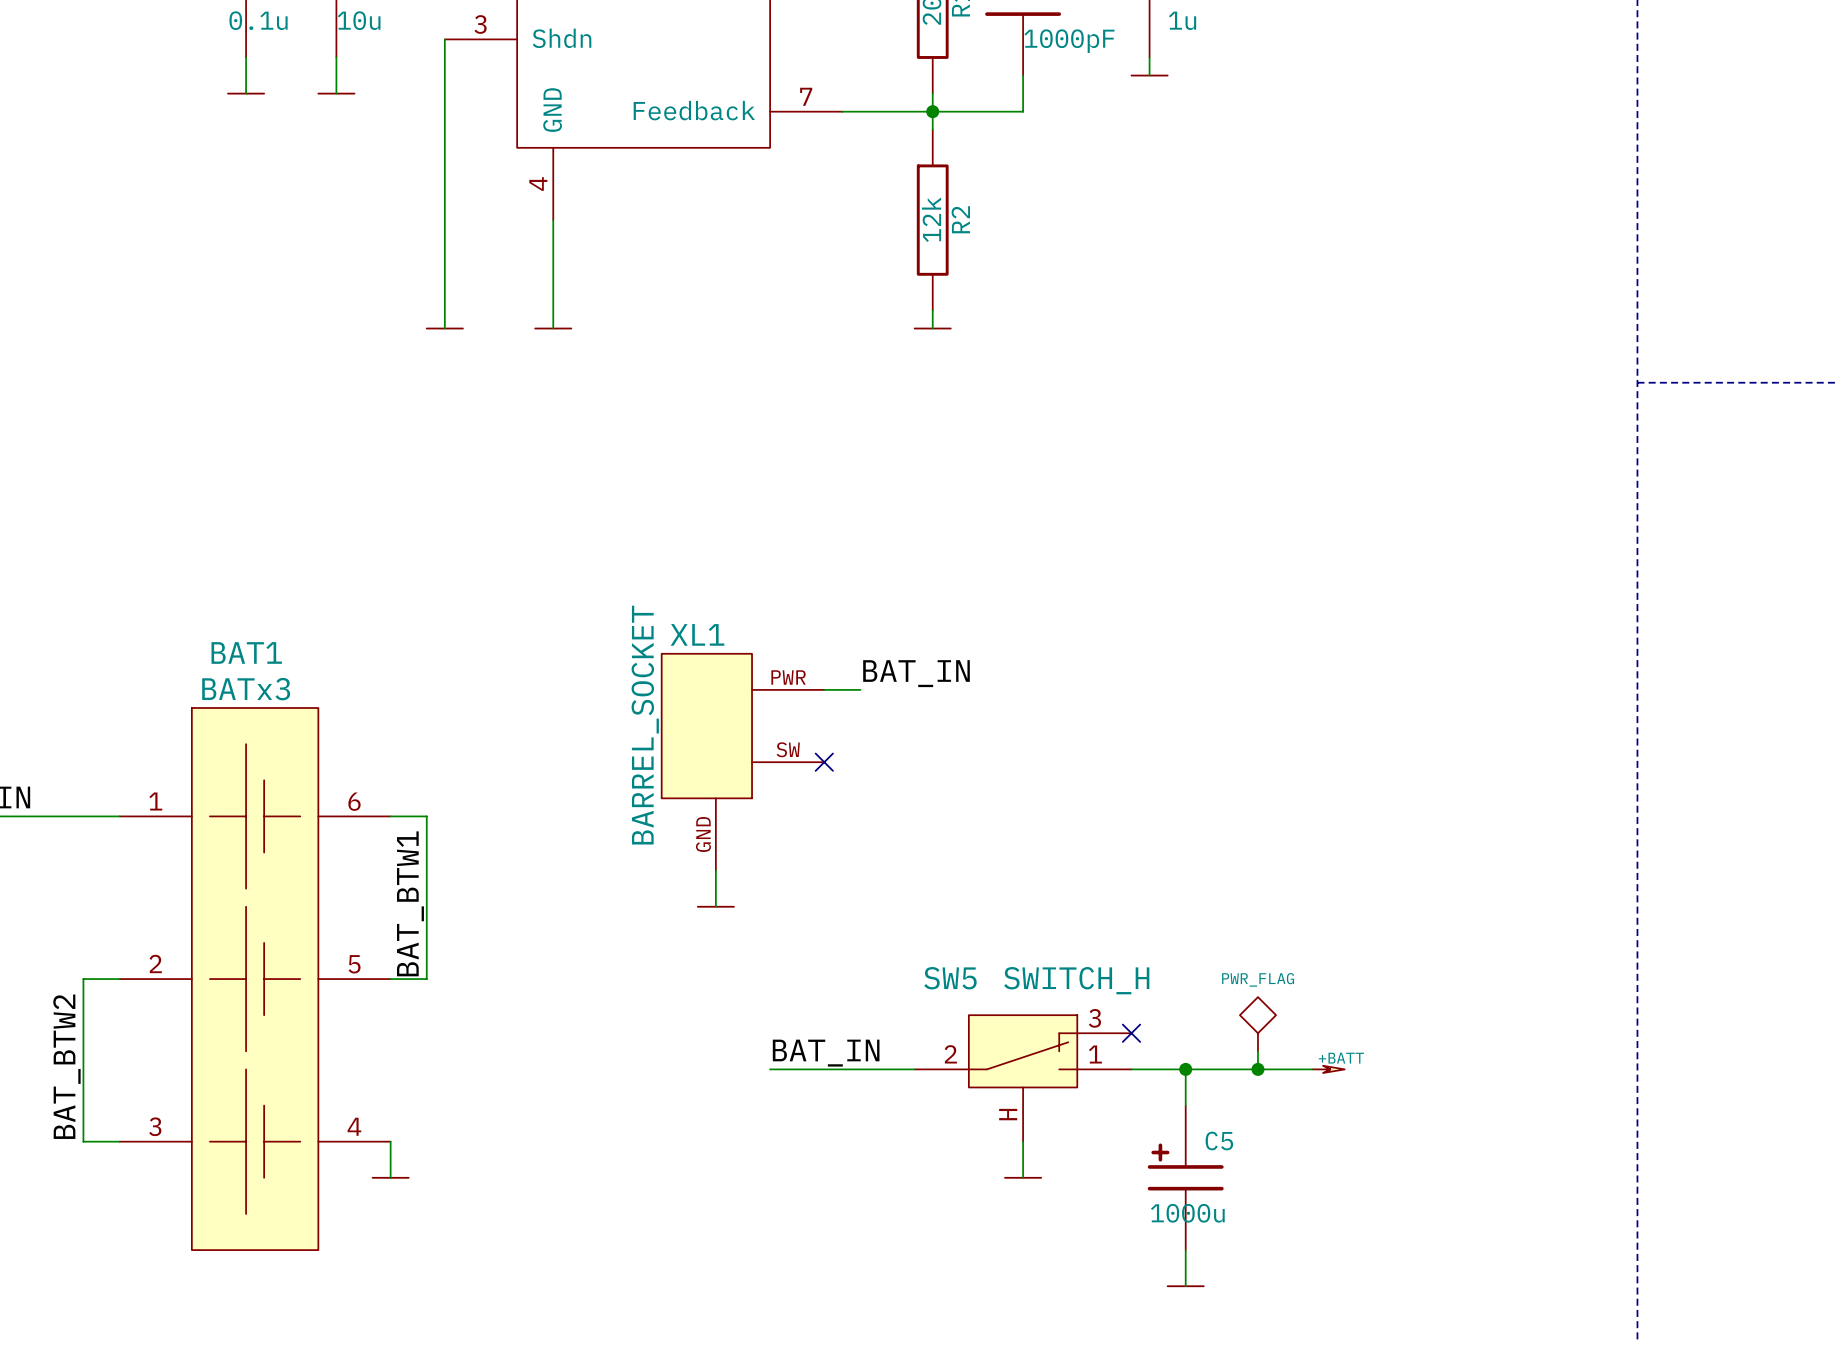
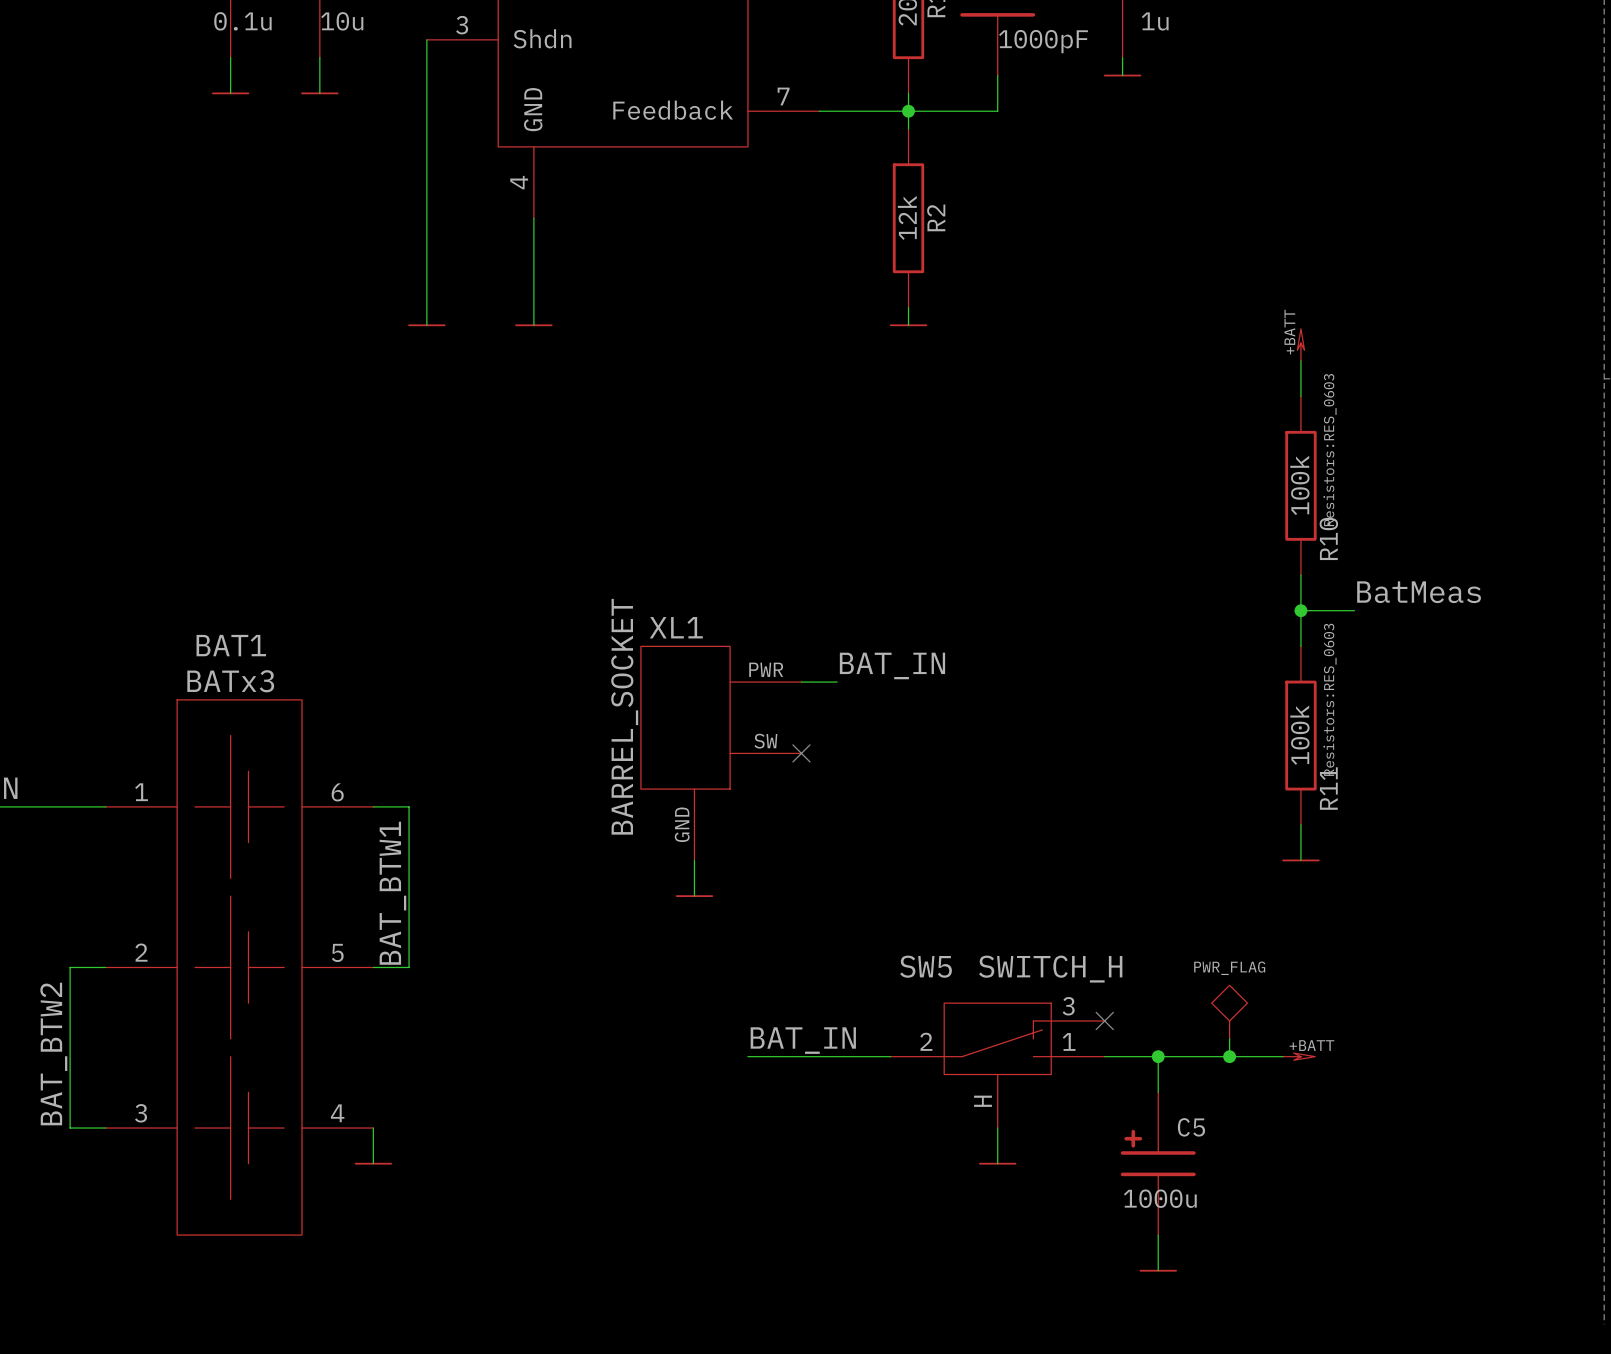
power symbol: none -> +BATT (1300, 344)
wire: none -> (1300, 360) (1300, 396)
R10: none -> 100k (1300, 485)
wire: none -> (1300, 575) (1300, 646)
label: none -> BatMeas (1419, 592)
wire: none -> (1300, 610) (1354, 610)
junction: none -> (1300, 610)
R11: none -> 100k (1300, 735)
wire: none -> (1300, 824) (1300, 860)
power symbol: none -> (1300, 860)

